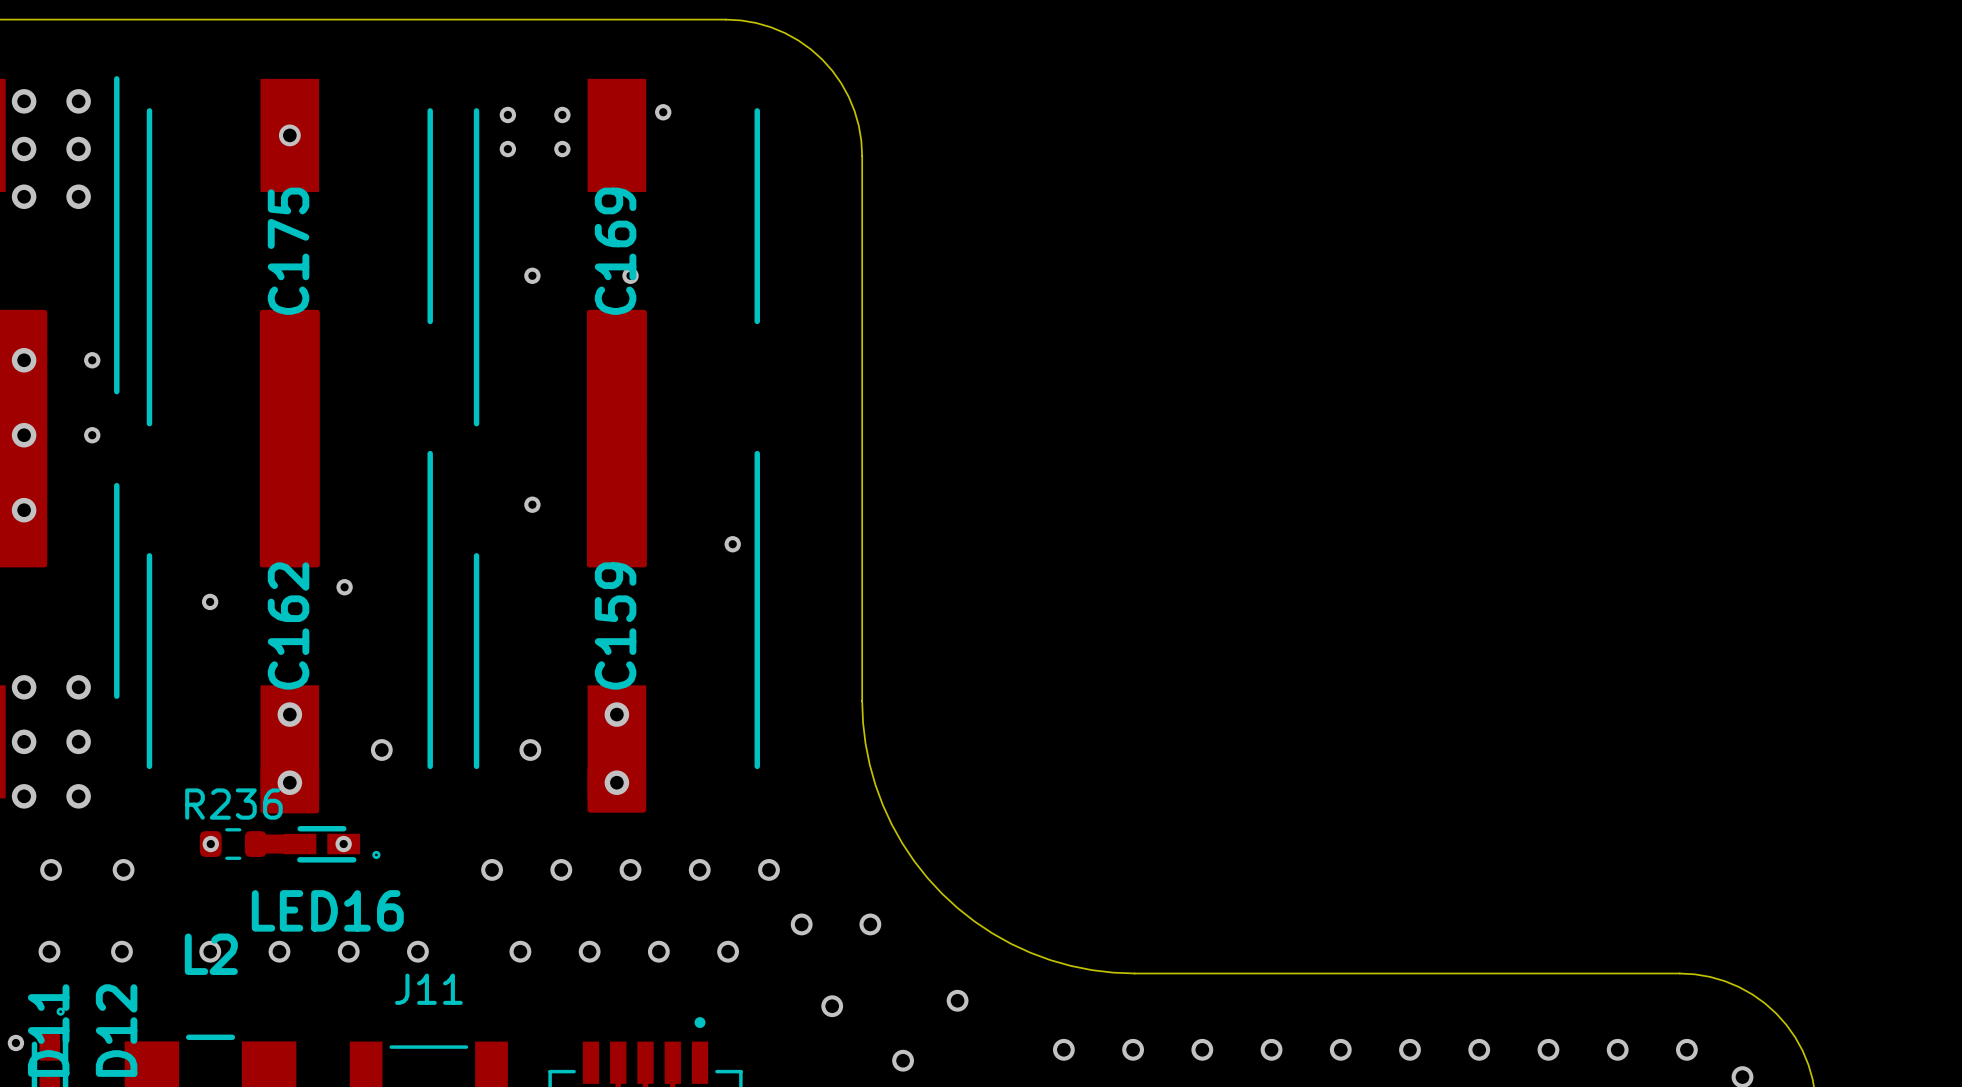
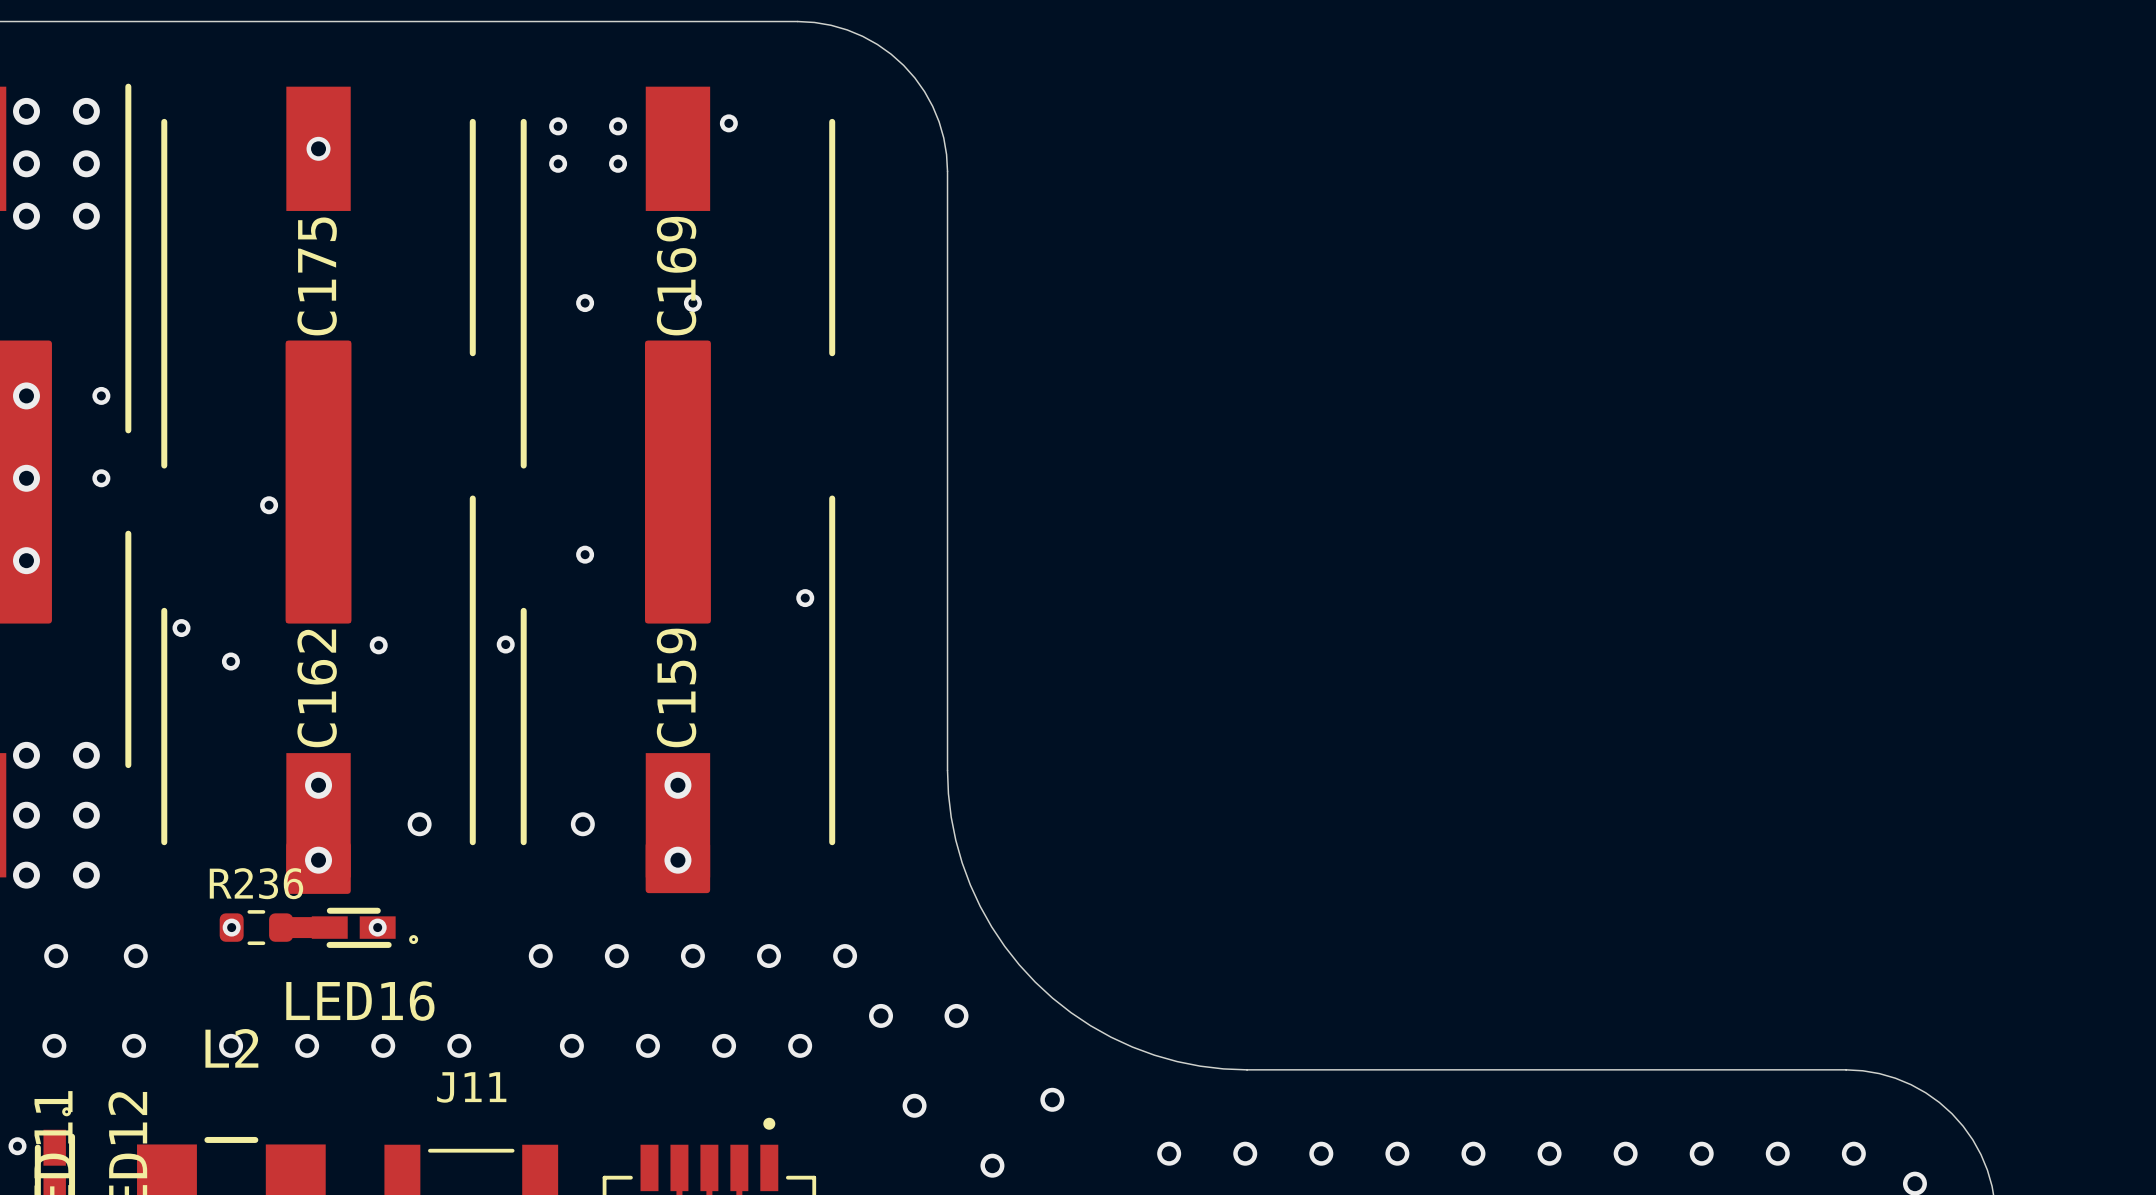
via: none -> (269, 505)
via: none -> (181, 628)
via: none -> (505, 644)

